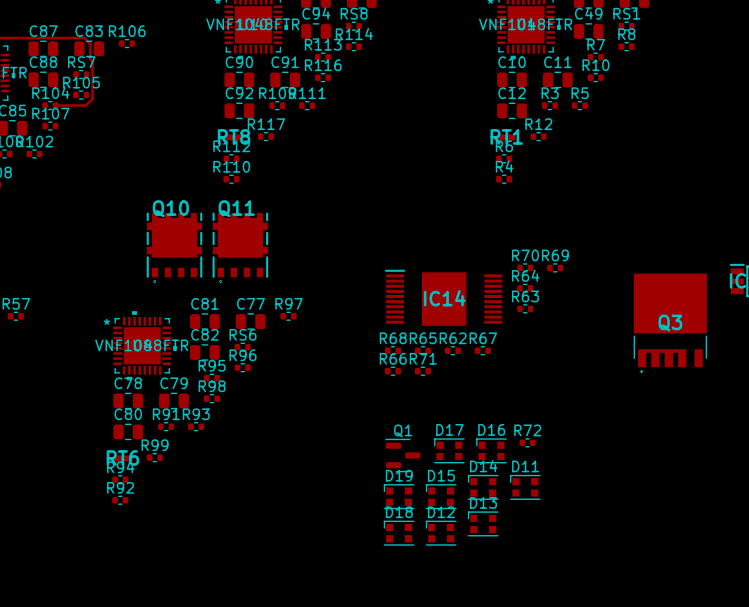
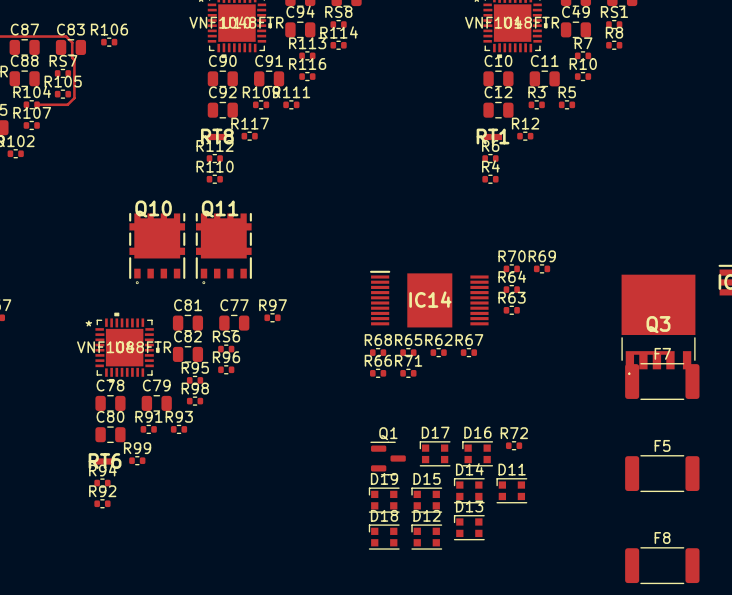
F7: none -> (662, 381)
F5: none -> (662, 473)
F8: none -> (662, 565)

